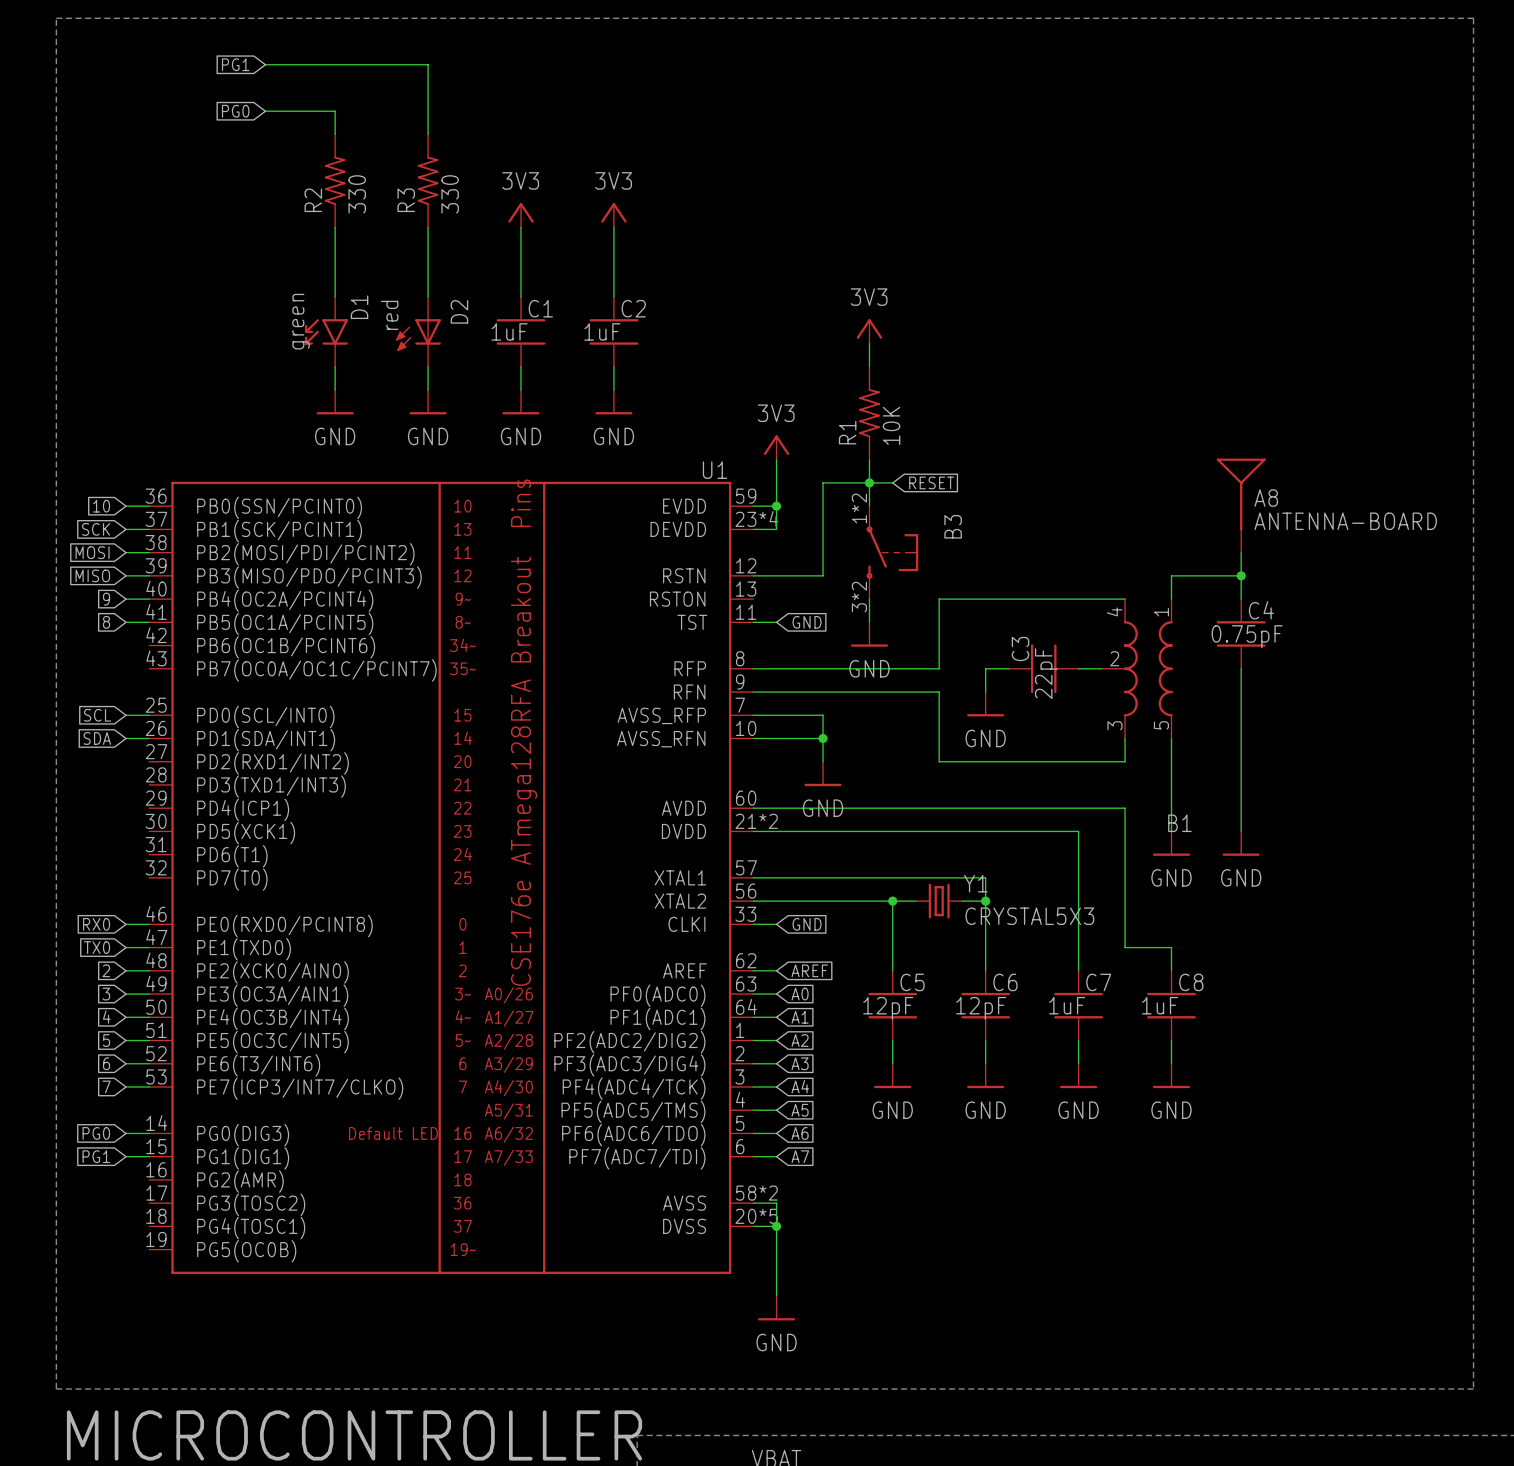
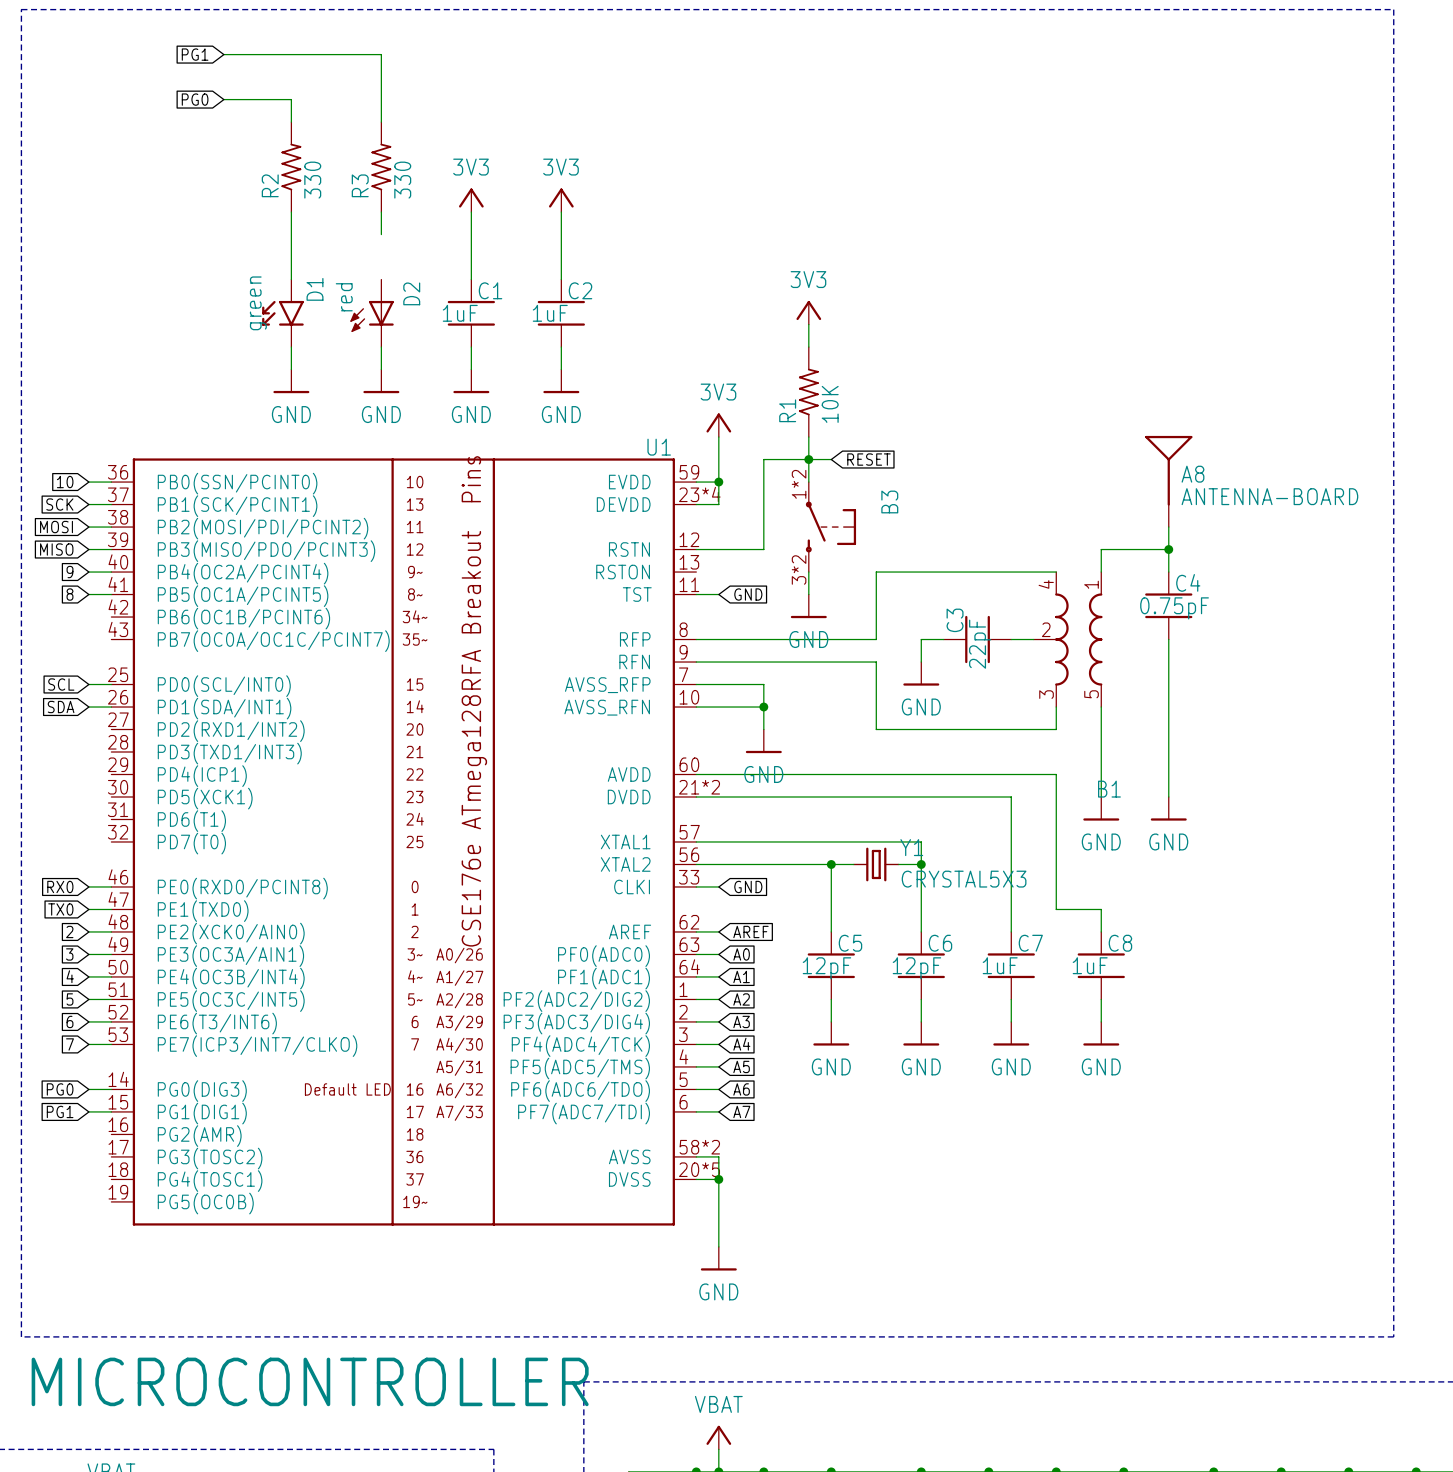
wire: (428, 250) (428, 297) -> none

